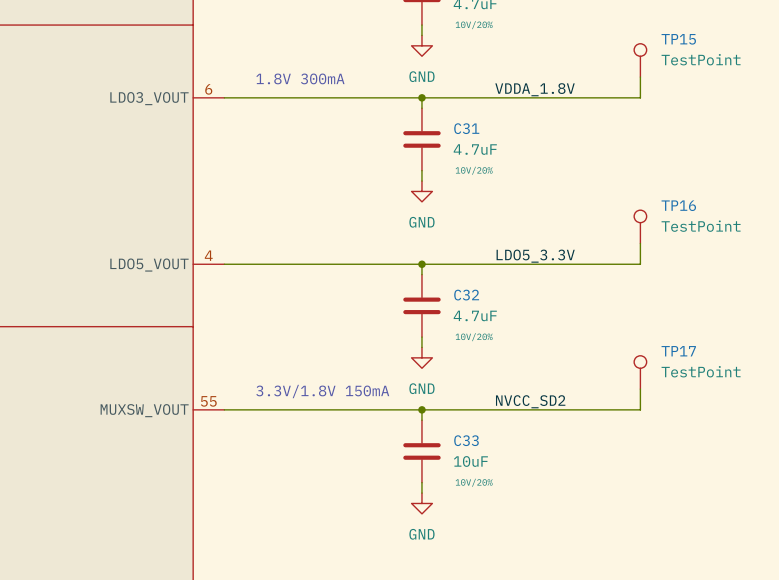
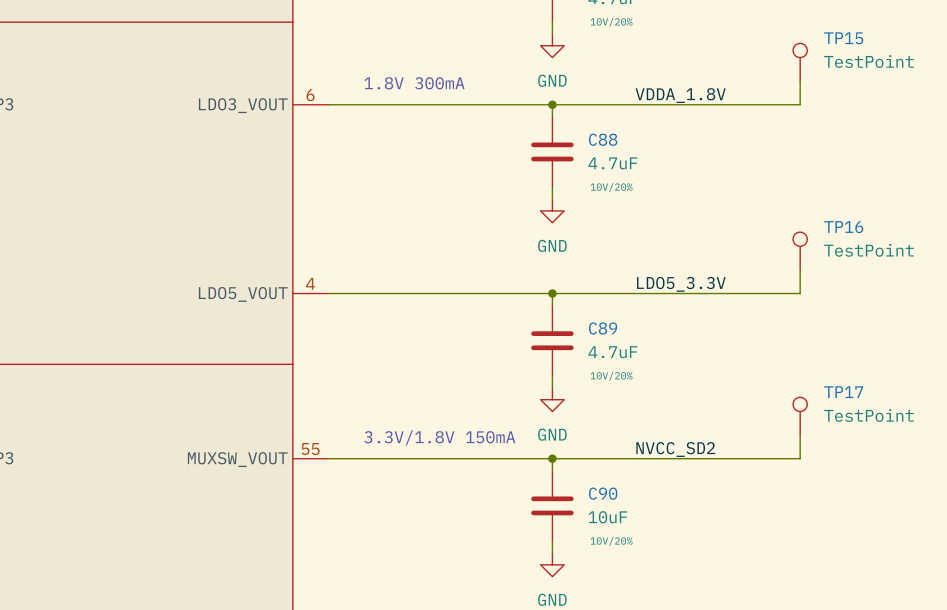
C31 name: C31 (466, 128) -> C88 (603, 139)
C32 name: C32 (466, 295) -> C89 (603, 328)
C33 name: C33 (466, 440) -> C90 (603, 493)

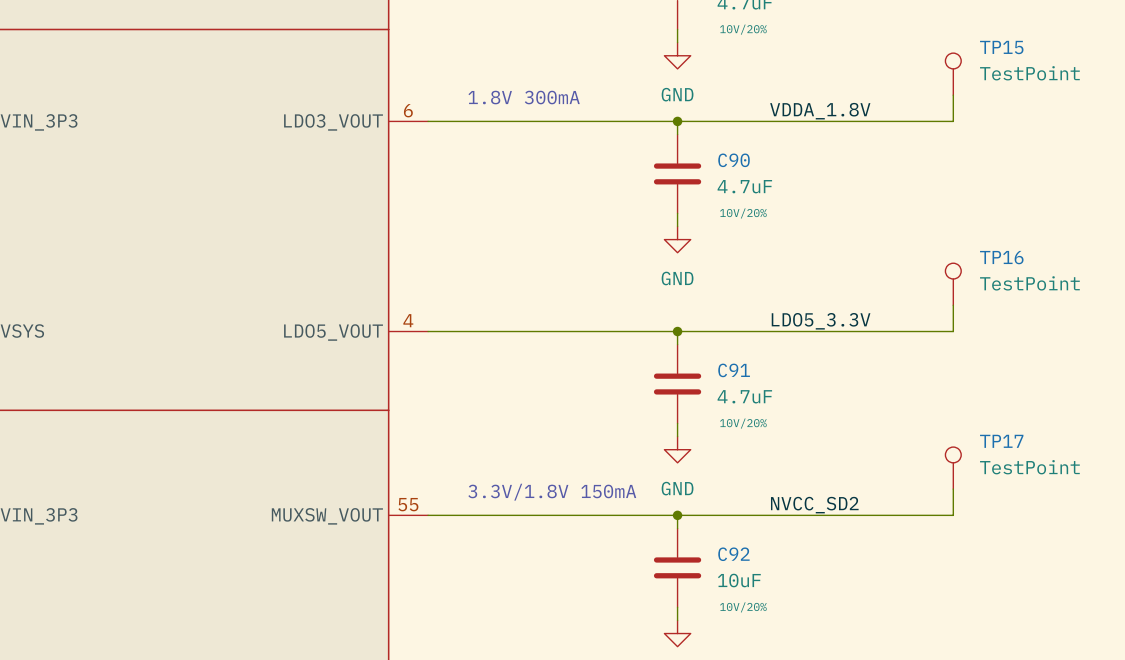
C88 name: C88 (603, 139) -> C90 (734, 160)
C89 name: C89 (603, 328) -> C91 (734, 370)
C90 name: C90 (603, 493) -> C92 (733, 554)

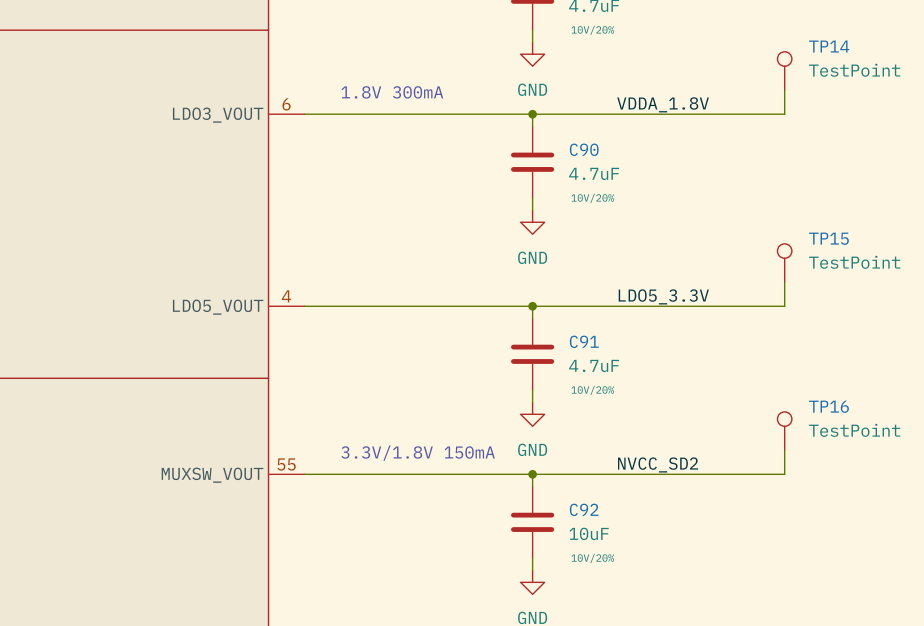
TP15 name: TP15 (1001, 47) -> TP14 (829, 46)
TP16 name: TP16 (1001, 257) -> TP15 (828, 238)
TP17 name: TP17 (1001, 441) -> TP16 (828, 406)

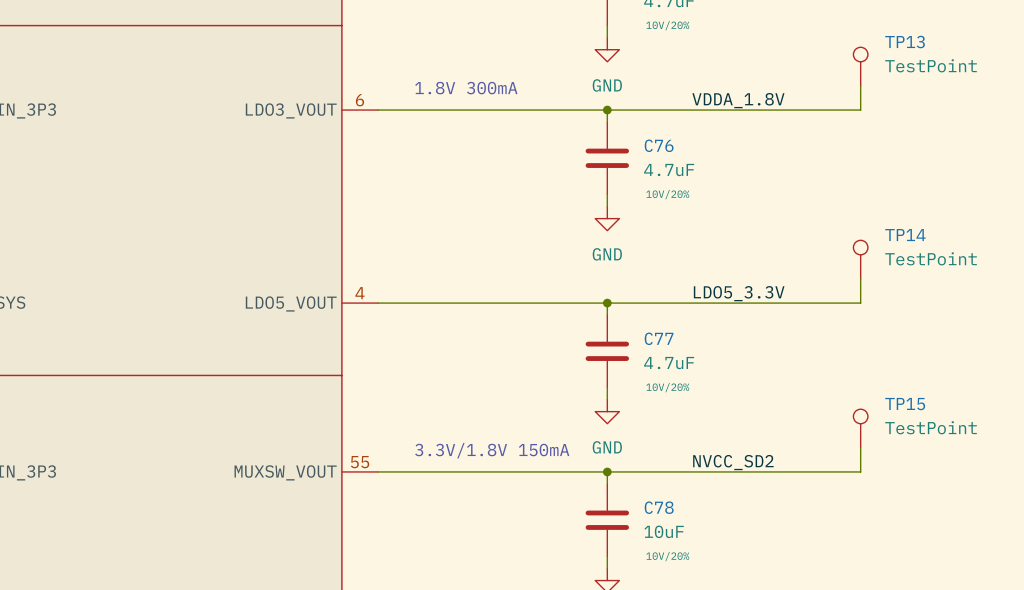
TP14 name: TP14 (829, 46) -> TP13 (905, 42)
C90 name: C90 (584, 149) -> C76 (659, 145)
TP15 name: TP15 (828, 238) -> TP14 (905, 235)
C91 name: C91 (584, 341) -> C77 (659, 338)
TP16 name: TP16 (828, 406) -> TP15 (905, 404)
C92 name: C92 (584, 509) -> C78 (659, 507)

